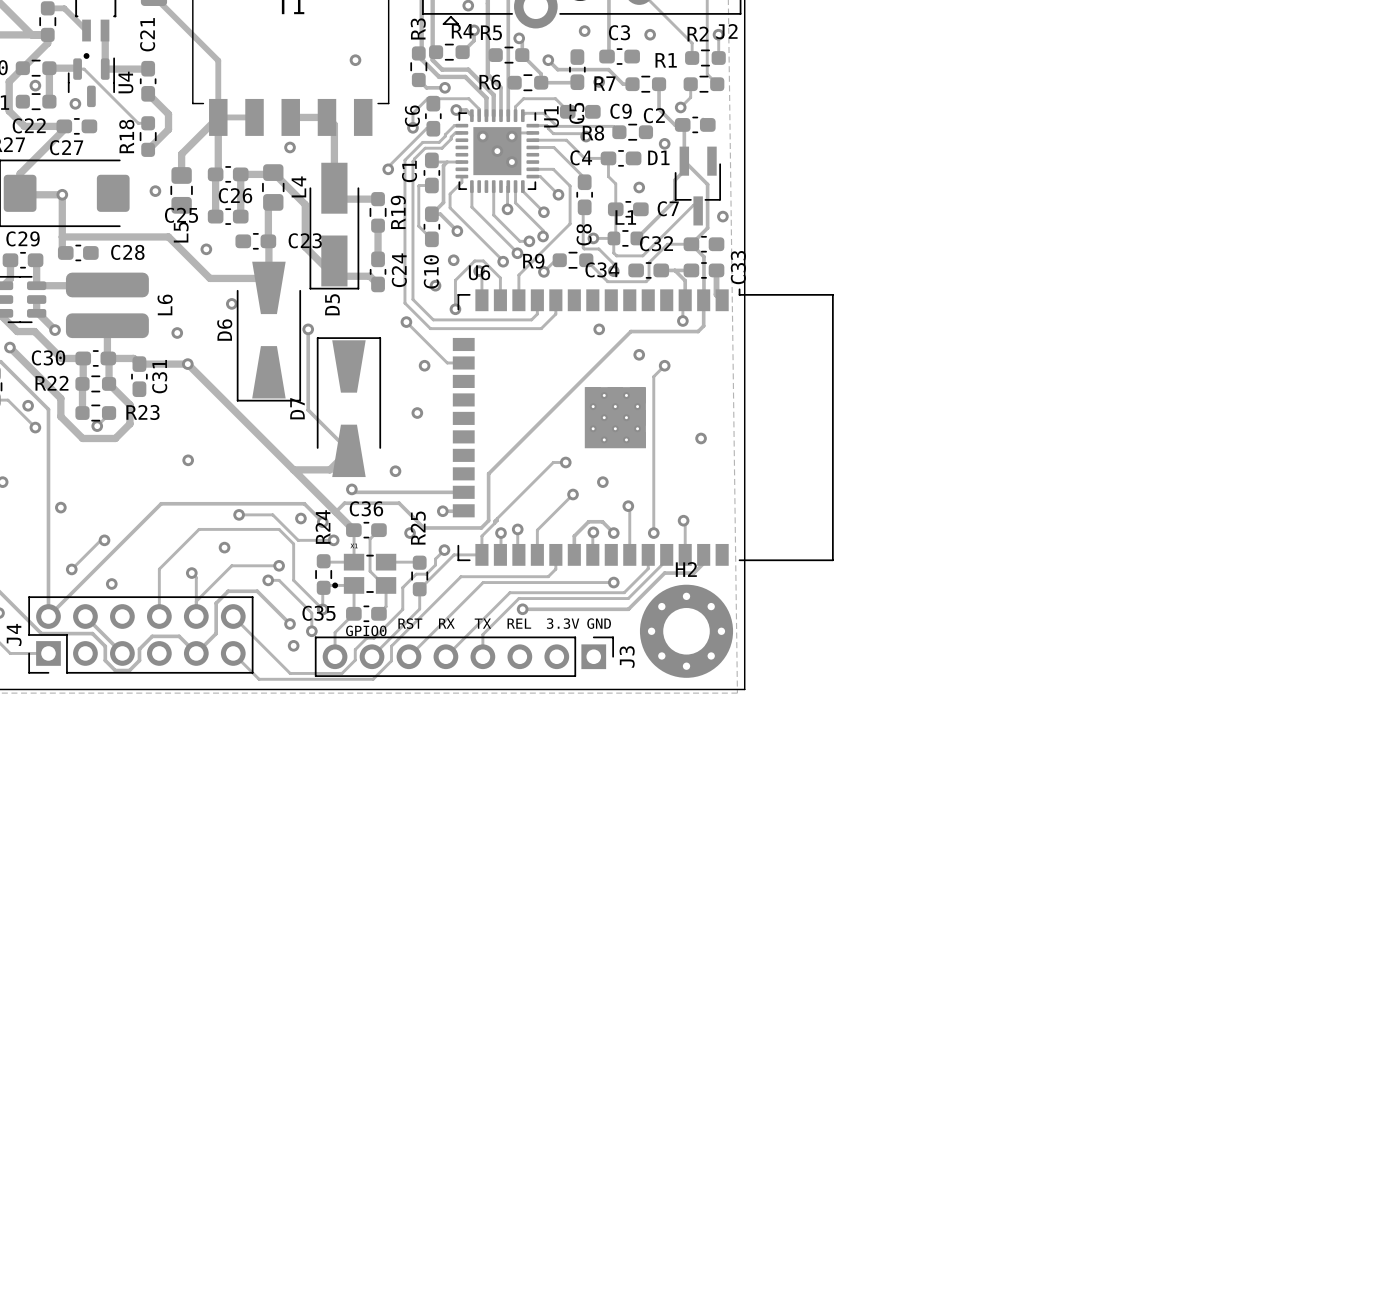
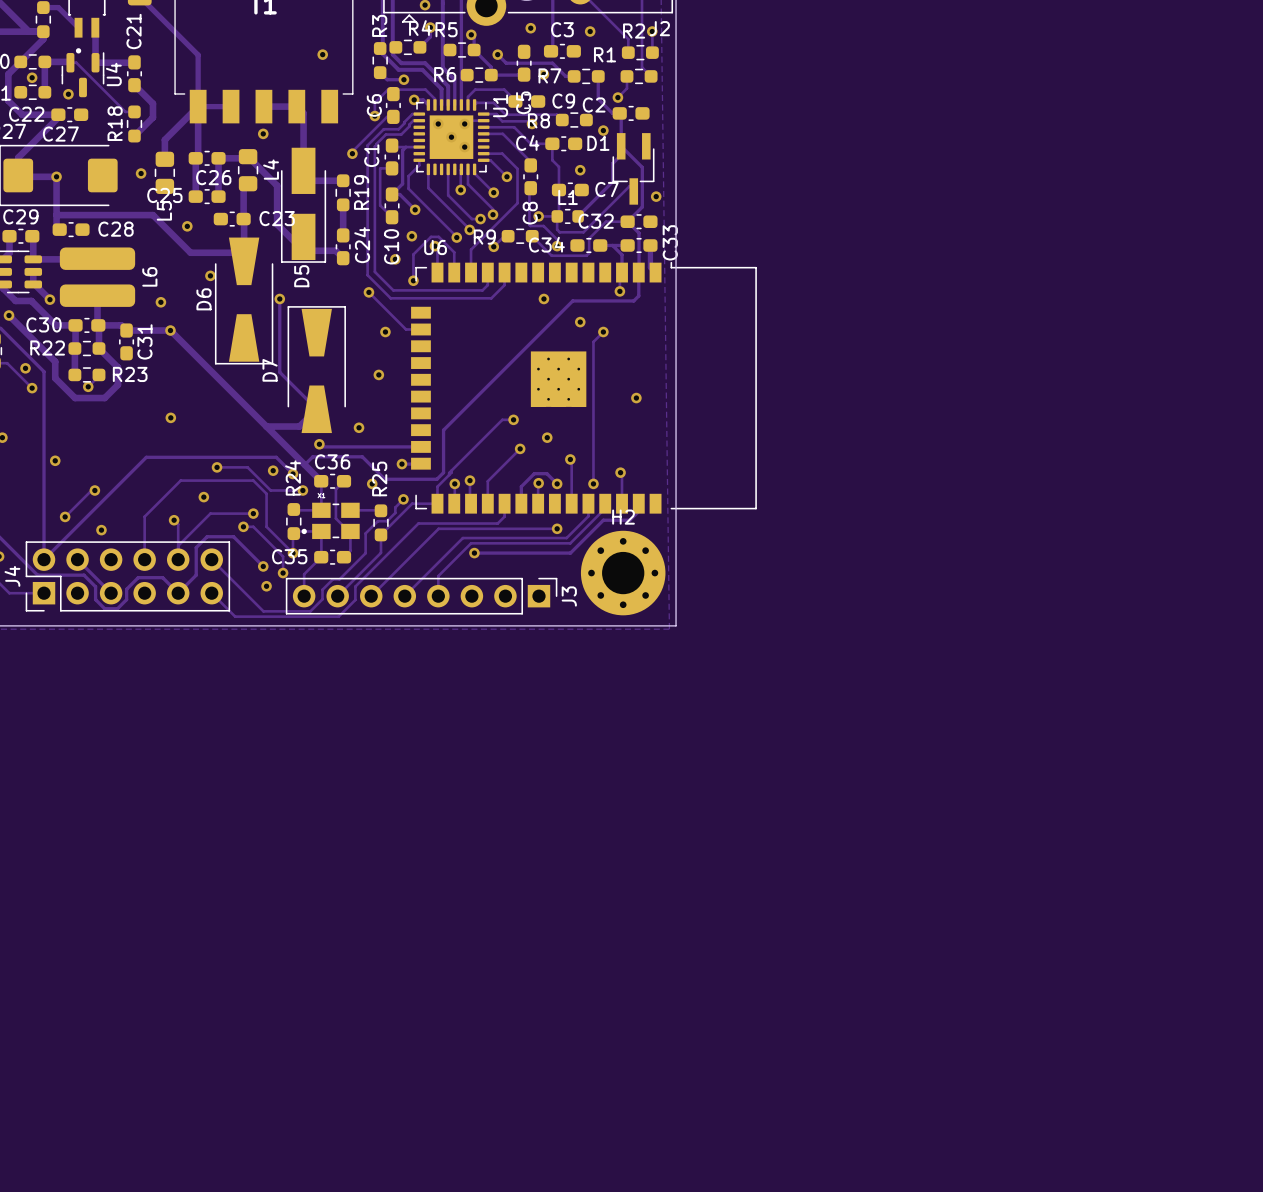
text: RST (410, 623) -> none
text: RX (446, 623) -> none
text: TX (482, 623) -> none
text: REL (519, 623) -> none
text: 3.3V (563, 623) -> none
text: GND (599, 623) -> none
text: GPIO0 (366, 630) -> none

